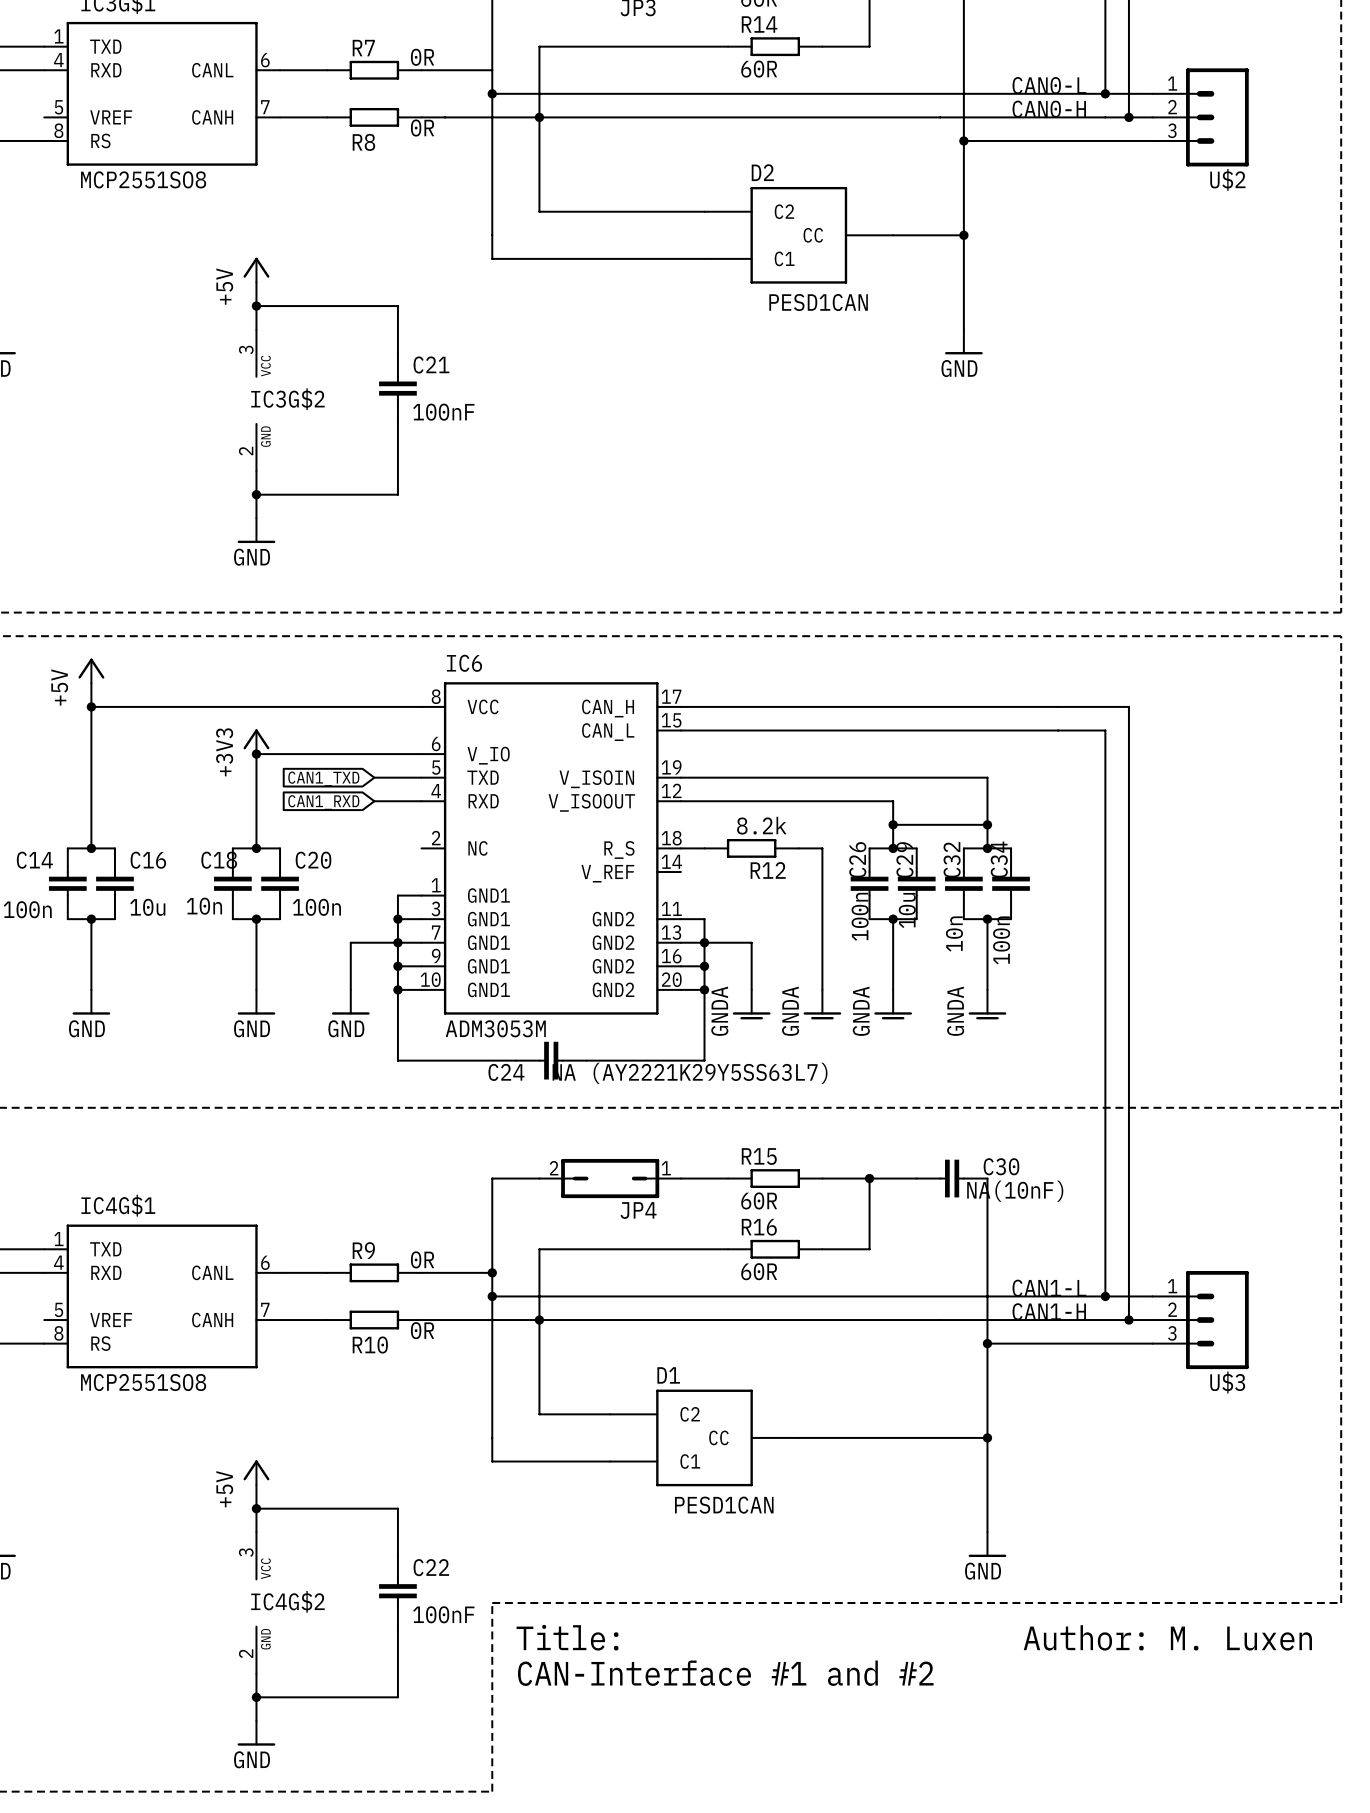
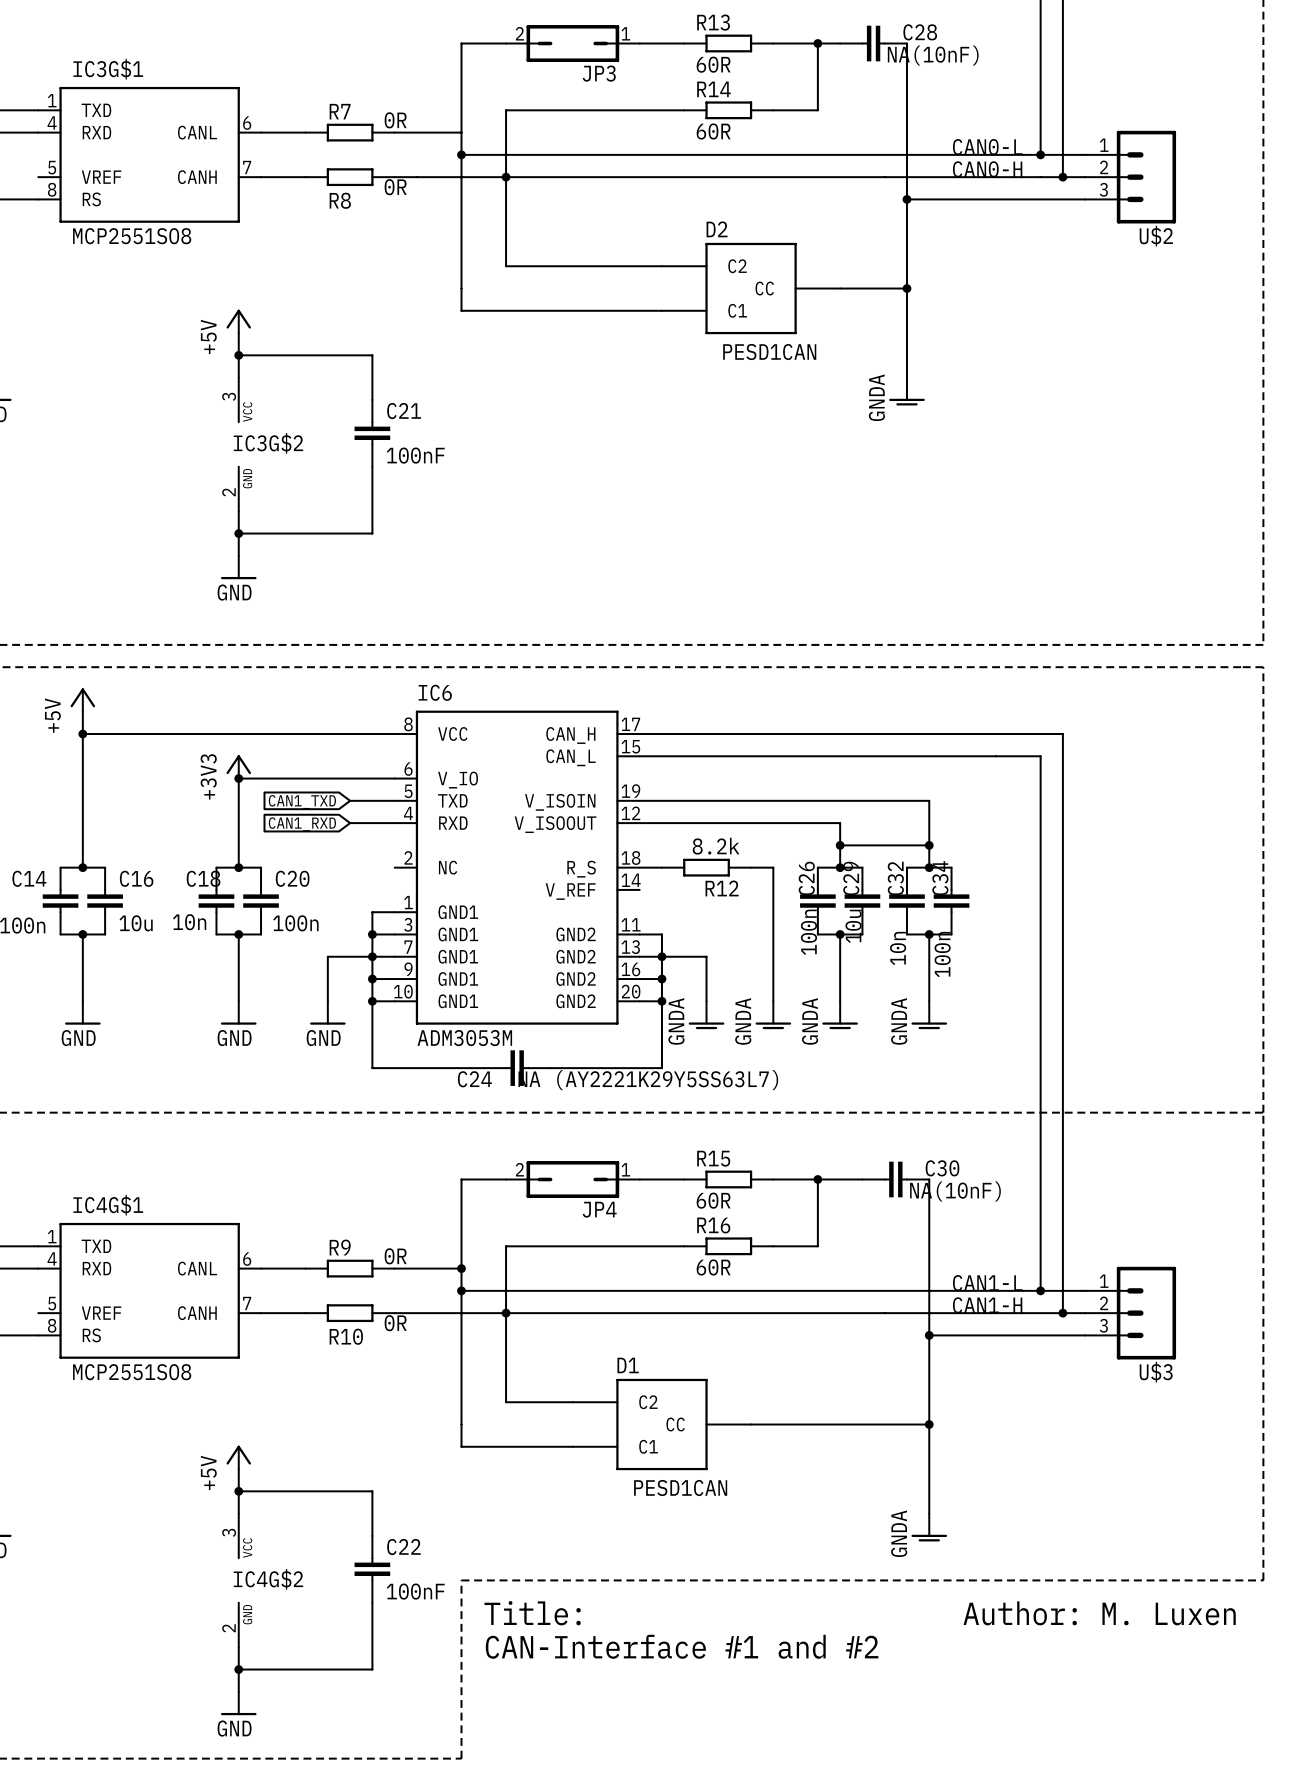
power symbol: GND (963, 342) -> GNDA (906, 391)
power symbol: GND (987, 1544) -> GNDA (929, 1527)

